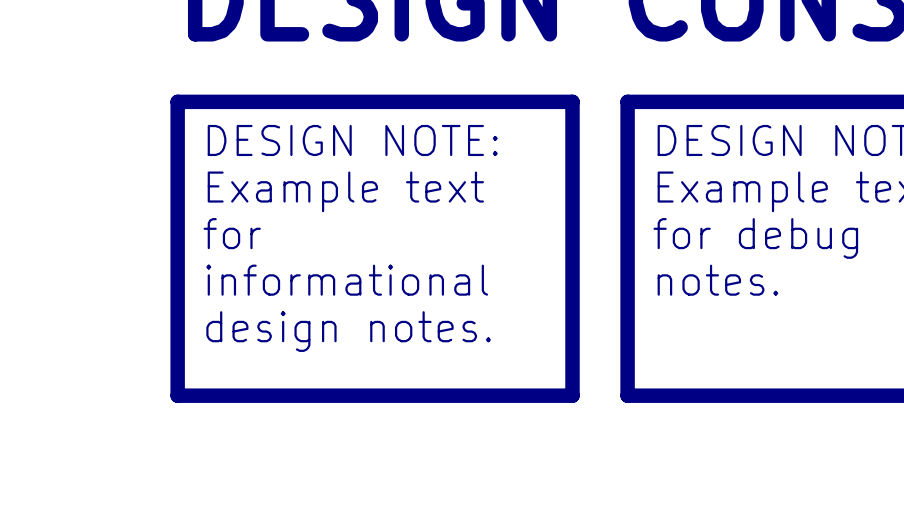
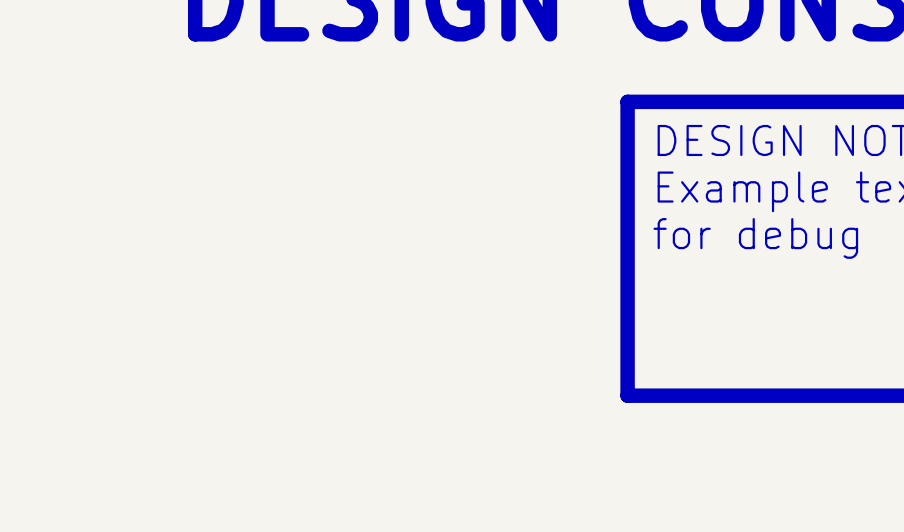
line: (177, 101) (572, 101) (572, 395) (177, 395) (177, 101) -> none
text: DESIGN NOTE: (352, 140) -> none
text: Example text (345, 191) -> none
text: for (232, 233) -> none
text: informational (347, 280) -> none
text: notes. (717, 280) -> none
text: design notes. (348, 331) -> none

